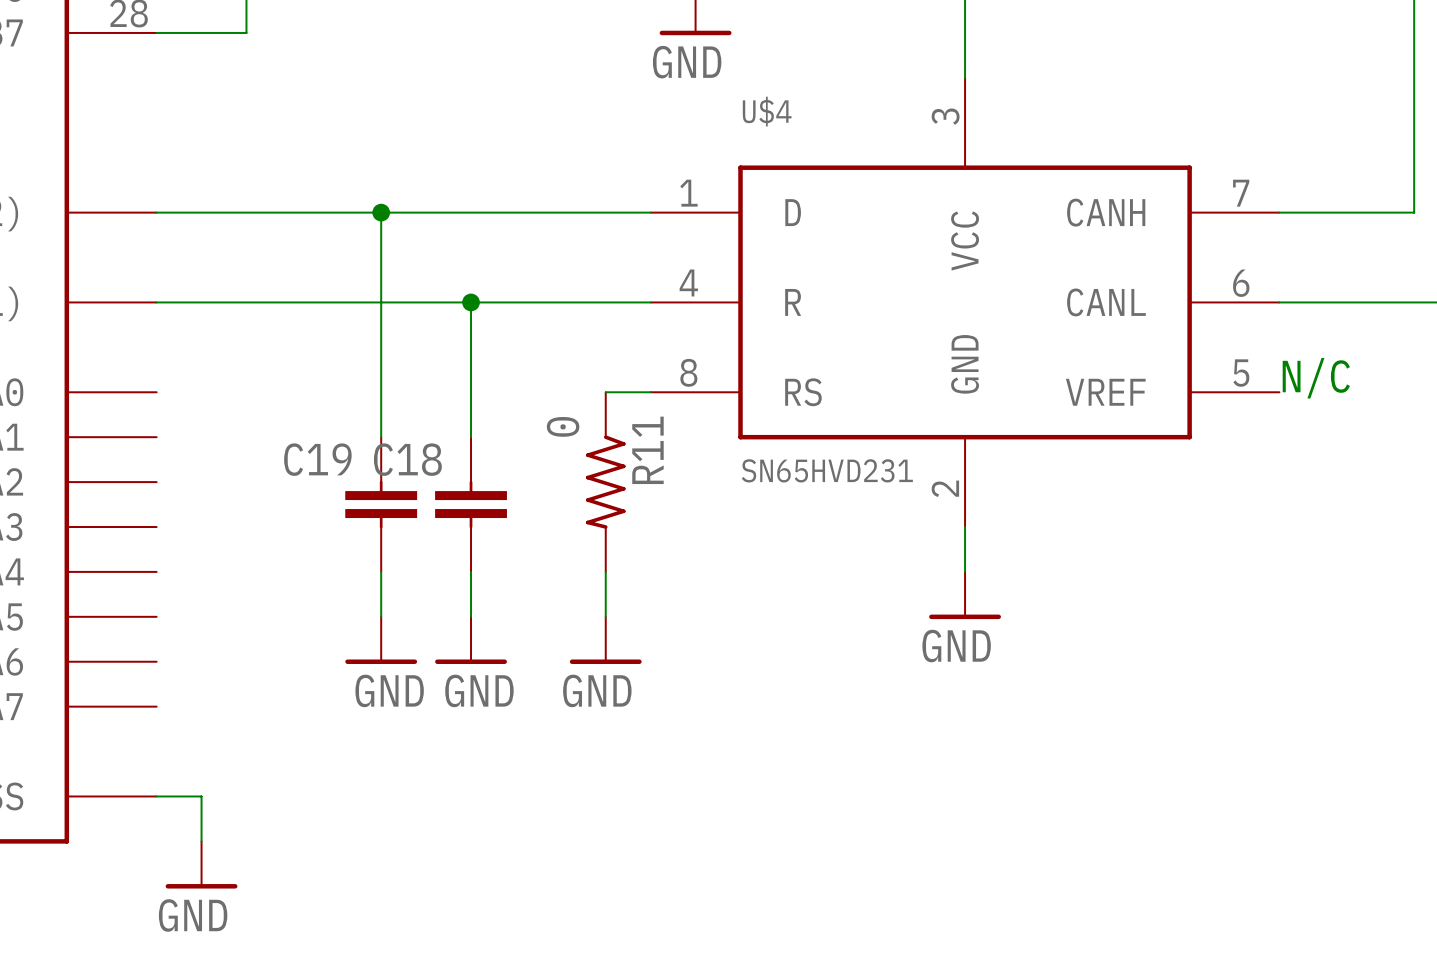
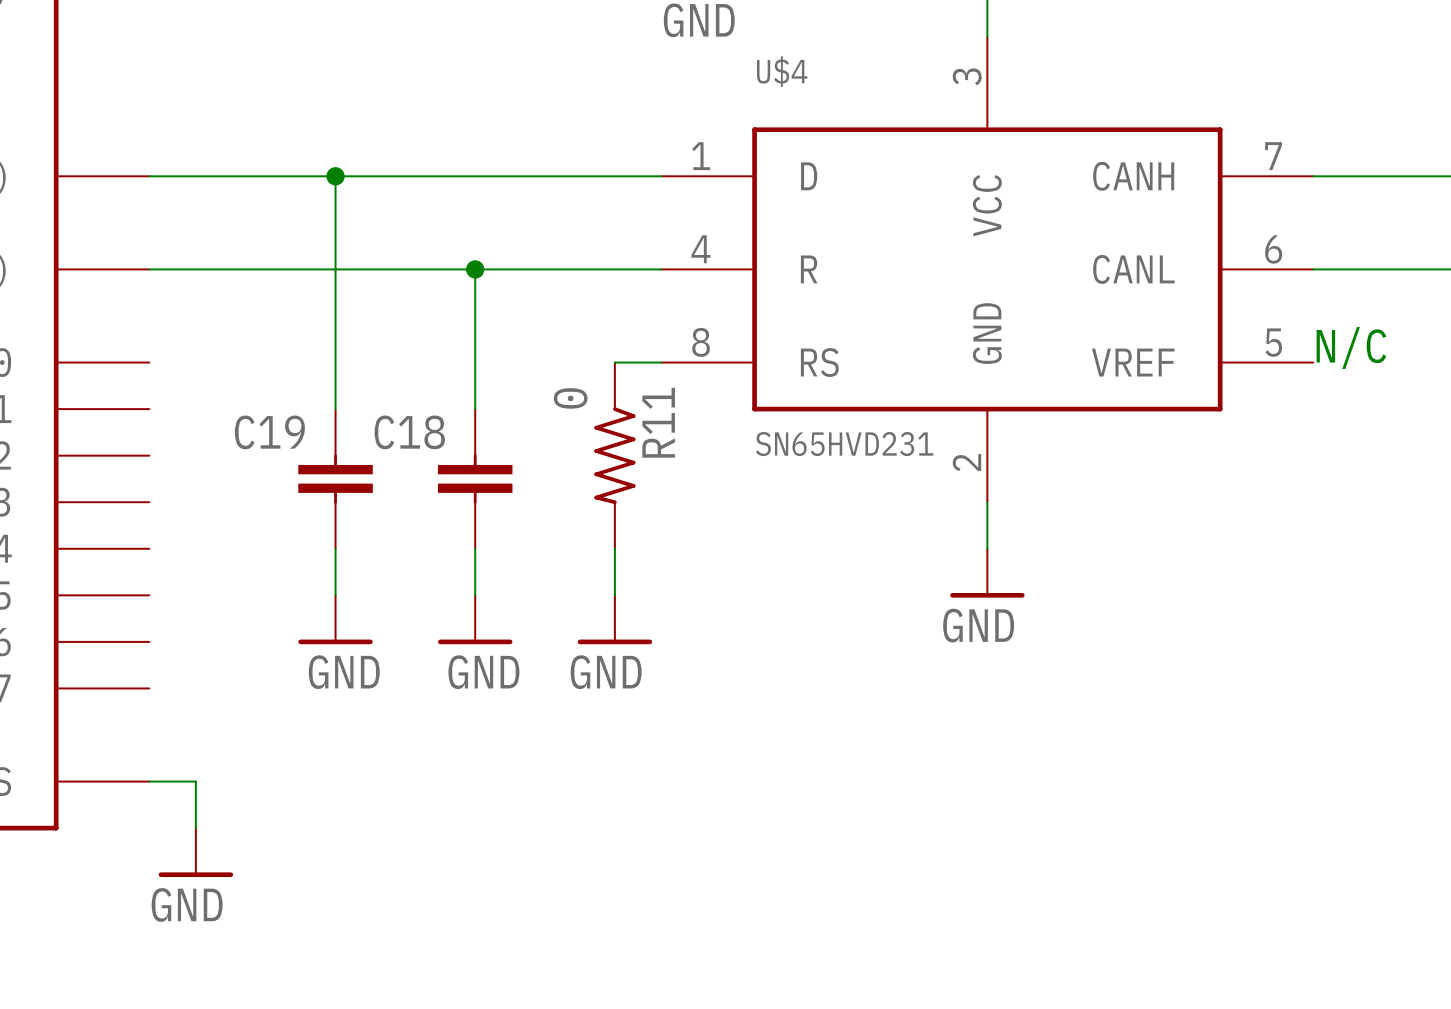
wire: (381, 212) (381, 437) -> (335, 176) (335, 409)
junction position: (381, 212) -> (335, 176)
C19 position: (381, 504) -> (335, 478)
wire: (381, 571) (381, 616) -> (335, 548) (335, 595)
power symbol position: GND (381, 640) -> GND (335, 619)

